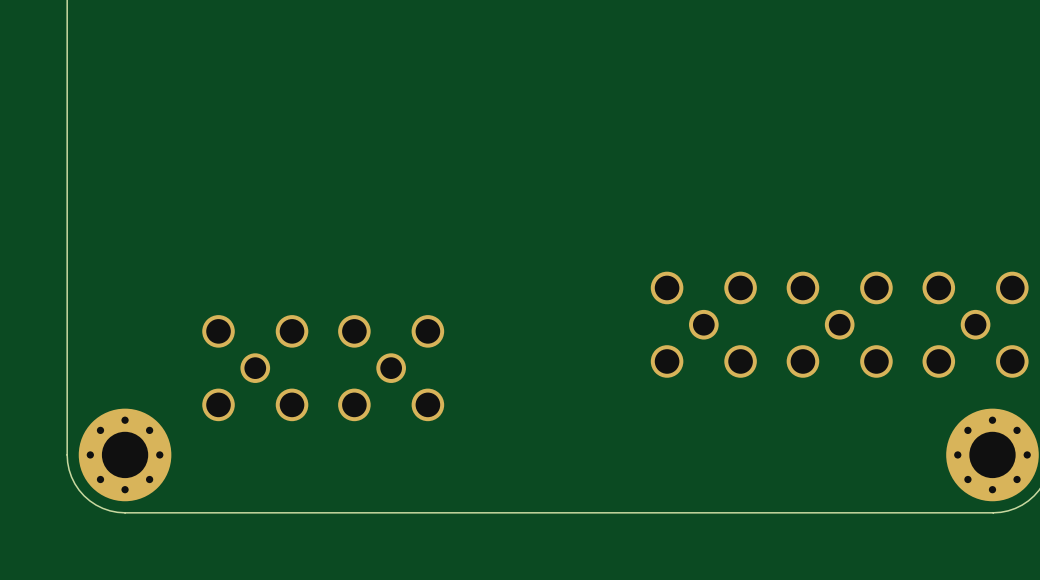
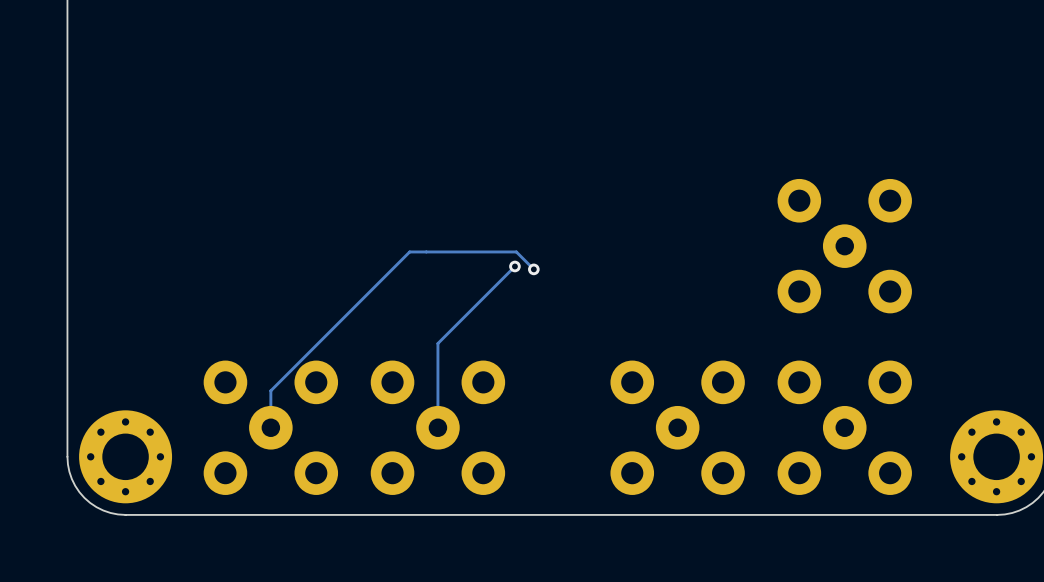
part: none -> (844, 246)
track: none -> (514, 266) (437, 343) (437, 427)
via: none -> (514, 266)
track: none -> (533, 269) (516, 251) (409, 251) (270, 390) (270, 427)
via: none -> (533, 269)
part: (703, 324) -> none
part: (839, 324) -> none
part: (975, 324) -> none
part: (255, 368) -> none
part: (391, 368) -> none
part: none -> (270, 427)
part: none -> (437, 427)
part: none -> (677, 427)
part: none -> (844, 427)

